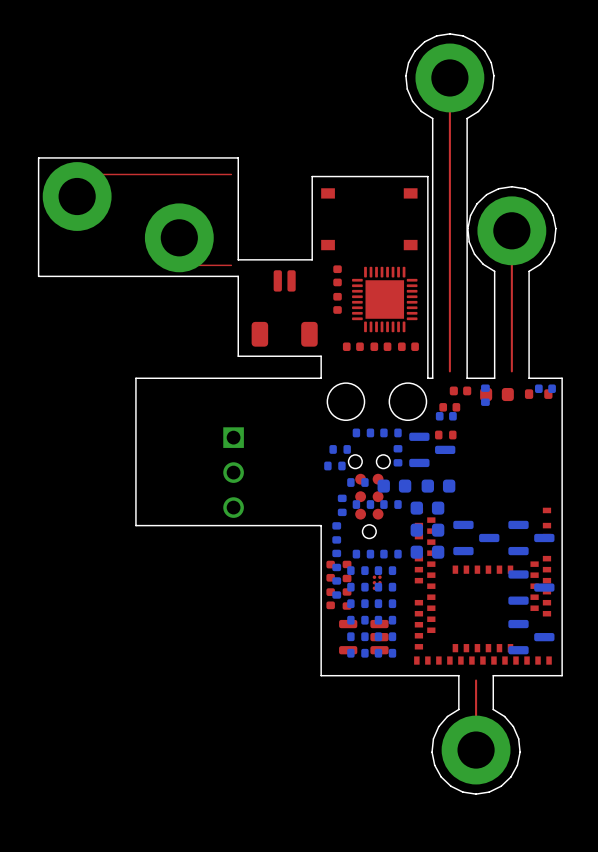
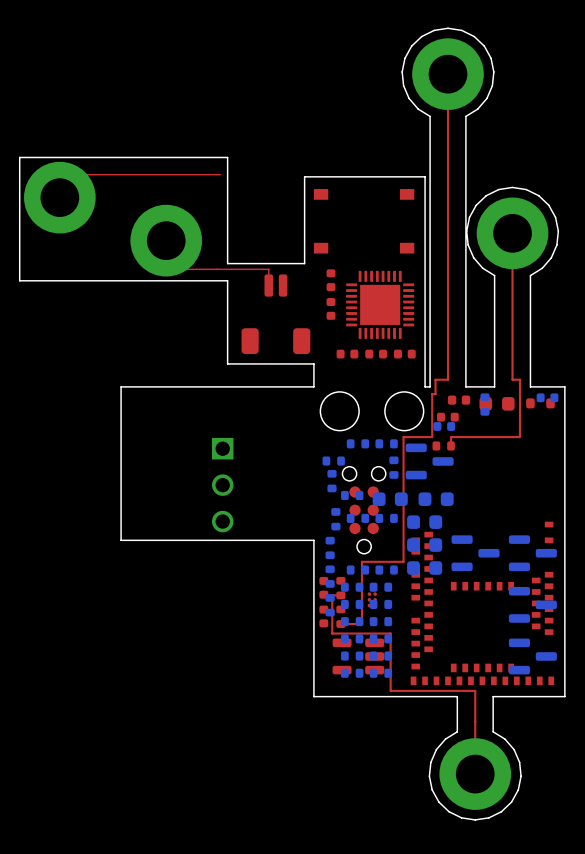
top track: none -> (220, 269) (268, 269) (268, 285)
top track: none -> (448, 379) (435, 379) (435, 394) (432, 394) (432, 437) (403, 437) (403, 561) (361, 561) (361, 624) (340, 624)
top track: none -> (512, 379) (519, 379) (519, 437) (451, 437) (451, 445)
part rotation: 0° (334, 465) -> 90° clockwise (332, 481)
top track: none -> (340, 595) (332, 595) (332, 633) (390, 633) (390, 690) (475, 690) (475, 701)

